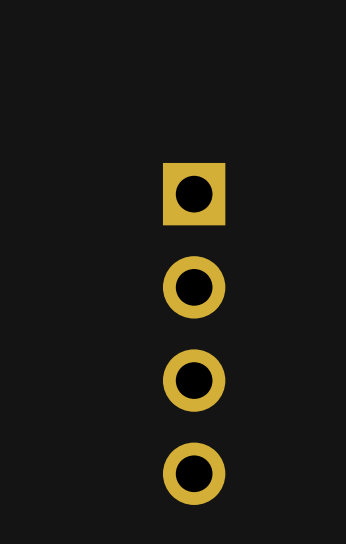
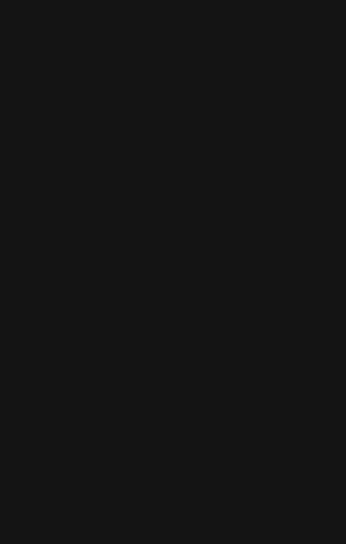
part: (194, 333) -> none

